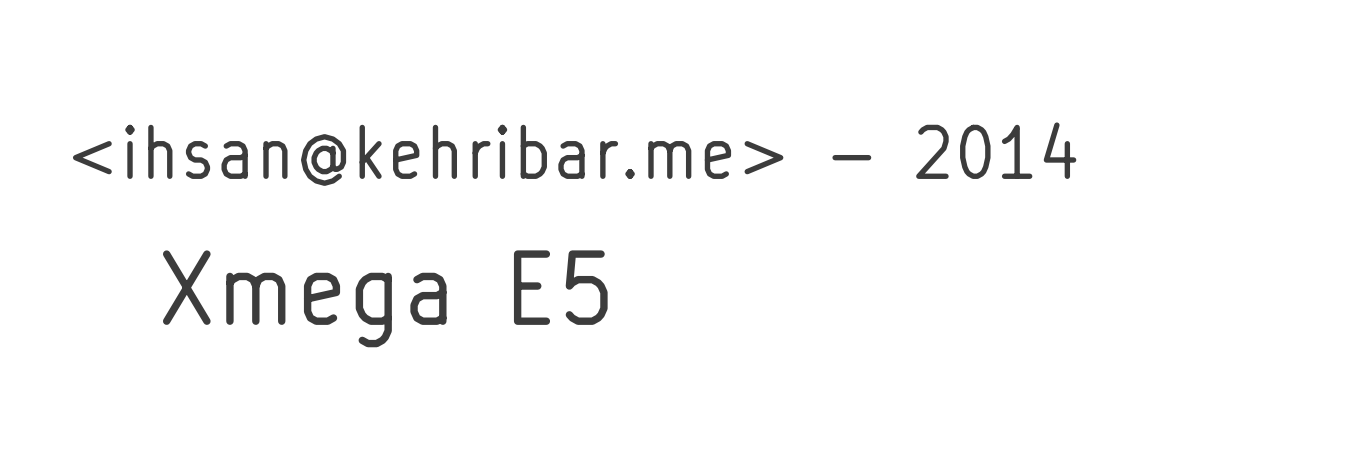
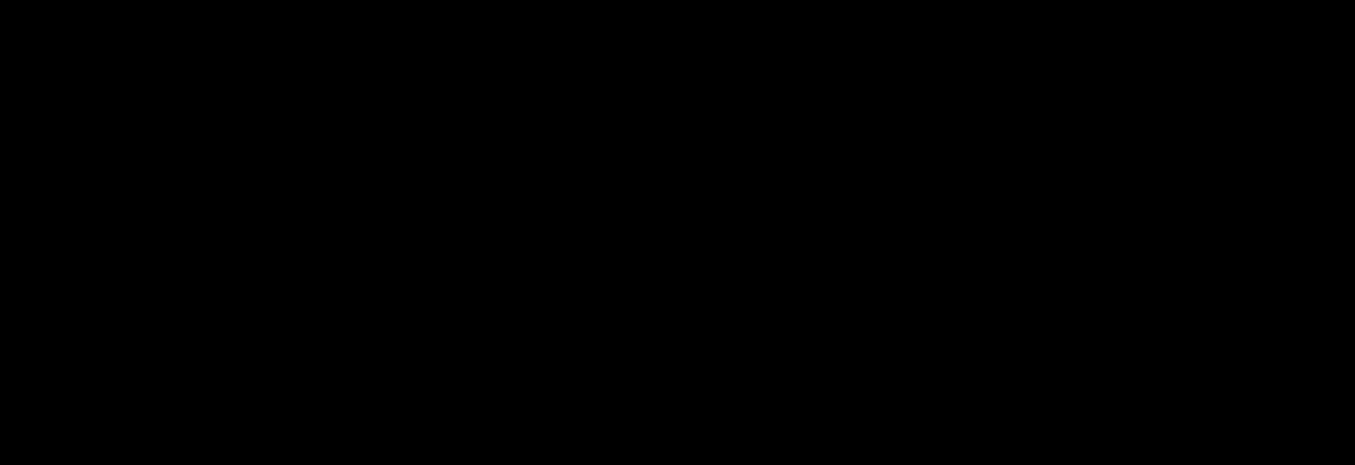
text: <ihsan@kehribar.me> - 2014 (574, 154) -> none
text: Xmega E5 (385, 298) -> none

